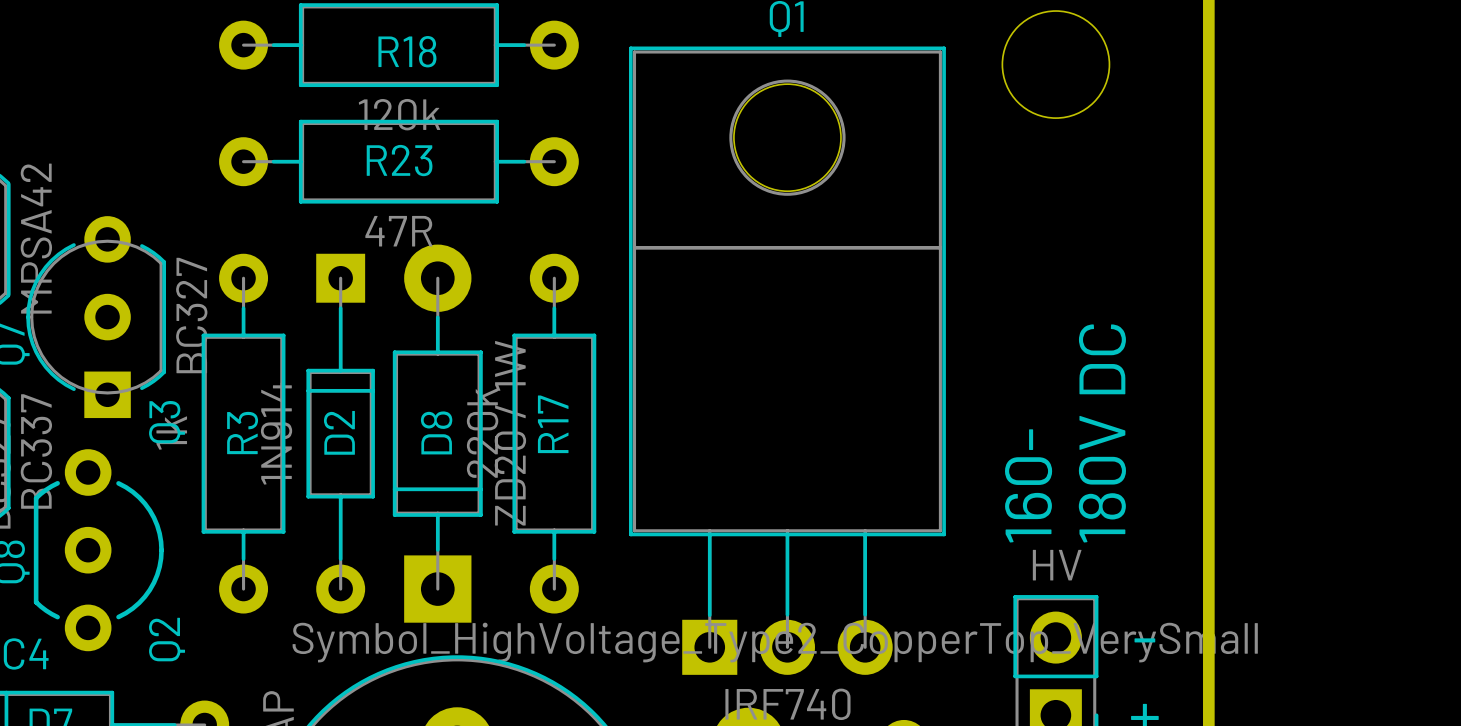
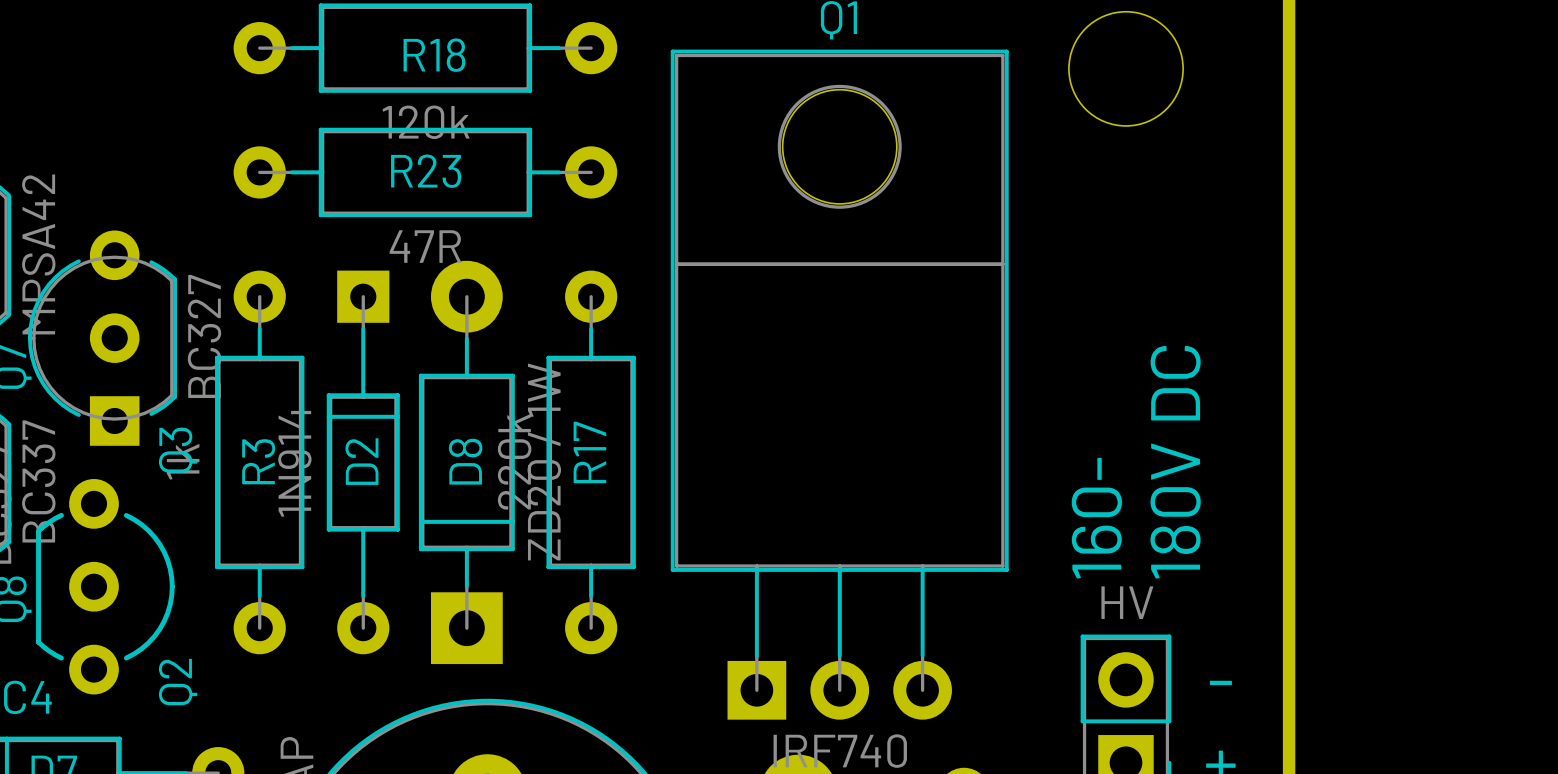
drawing: [292, 622, 1258, 663] -> none

